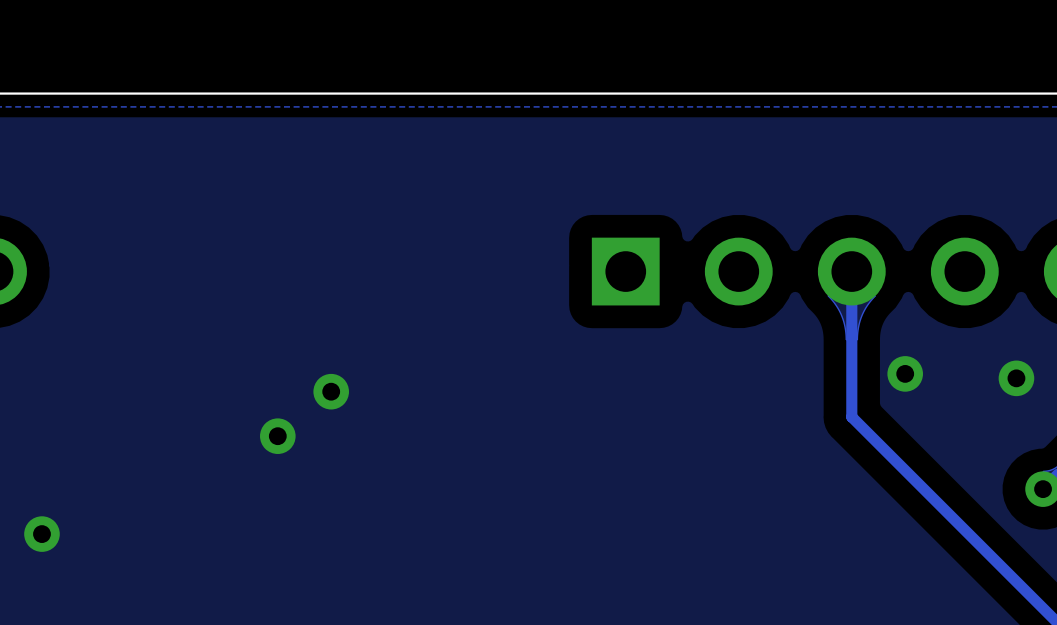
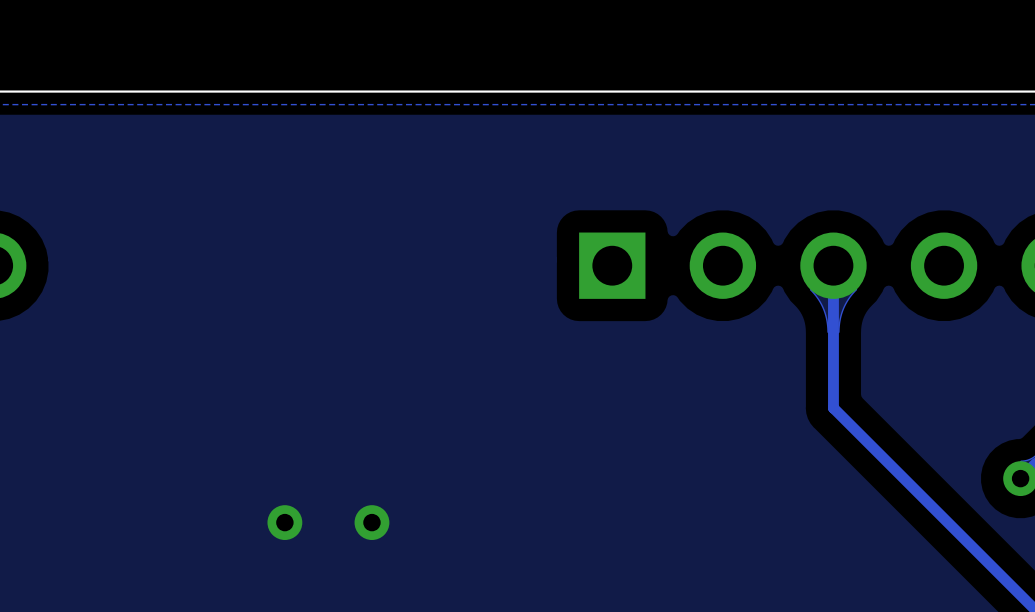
via: (905, 373) -> none
via: (1016, 378) -> none
via: (331, 391) -> none
via: (277, 436) -> none
via: (41, 534) -> none
via: none -> (284, 522)
via: none -> (371, 522)

